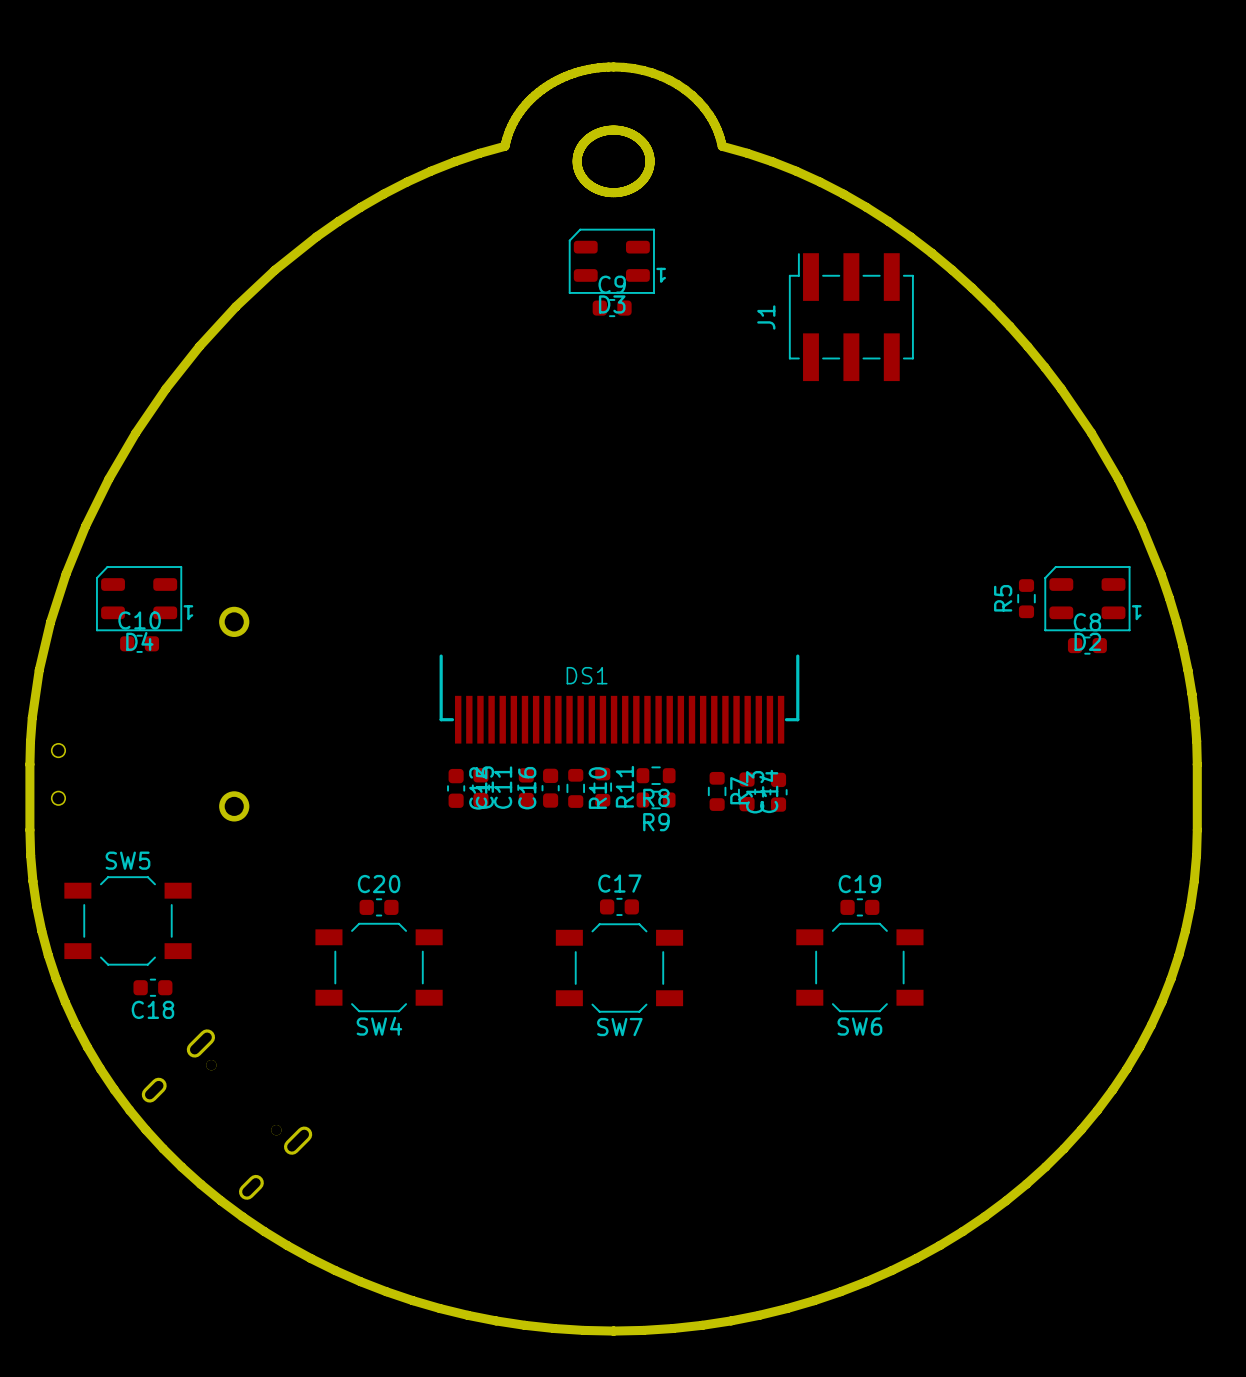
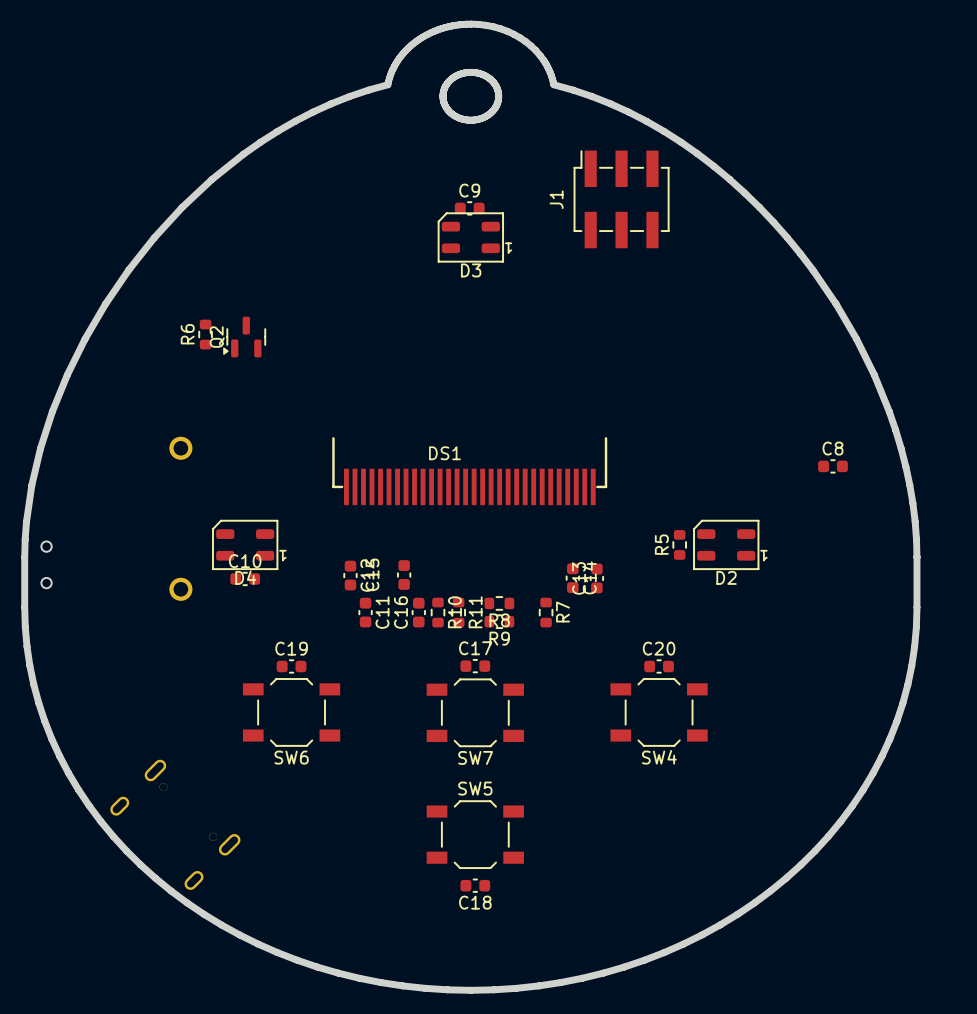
D3 position: (611, 261) -> (470, 237)
J1 position: (851, 317) -> (621, 199)
R6: none -> (205, 334)
Q2: none -> (244, 337)
D4 position: (139, 598) -> (245, 544)
R5 position: (1026, 598) -> (679, 544)
D2 position: (1087, 598) -> (726, 544)
C10 position: (139, 643) -> (245, 578)
DS1 position: (619, 699) -> (469, 471)
R8 position: (656, 775) -> (499, 603)
C11 position: (480, 787) -> (365, 612)
R11 position: (602, 787) -> (458, 612)
C16 position: (550, 788) -> (418, 612)
R10 position: (575, 788) -> (438, 612)
R7 position: (717, 791) -> (546, 612)
R9 position: (656, 800) -> (499, 621)
C20 name: C20 (379, 884) -> C19 (291, 648)
C19 name: C19 (859, 884) -> C20 (659, 648)
SW5 position: (127, 920) -> (475, 834)
C18 position: (152, 987) -> (475, 885)
SW4 name: SW4 (379, 1026) -> SW6 (291, 757)
SW6 name: SW6 (859, 1026) -> SW4 (659, 757)

